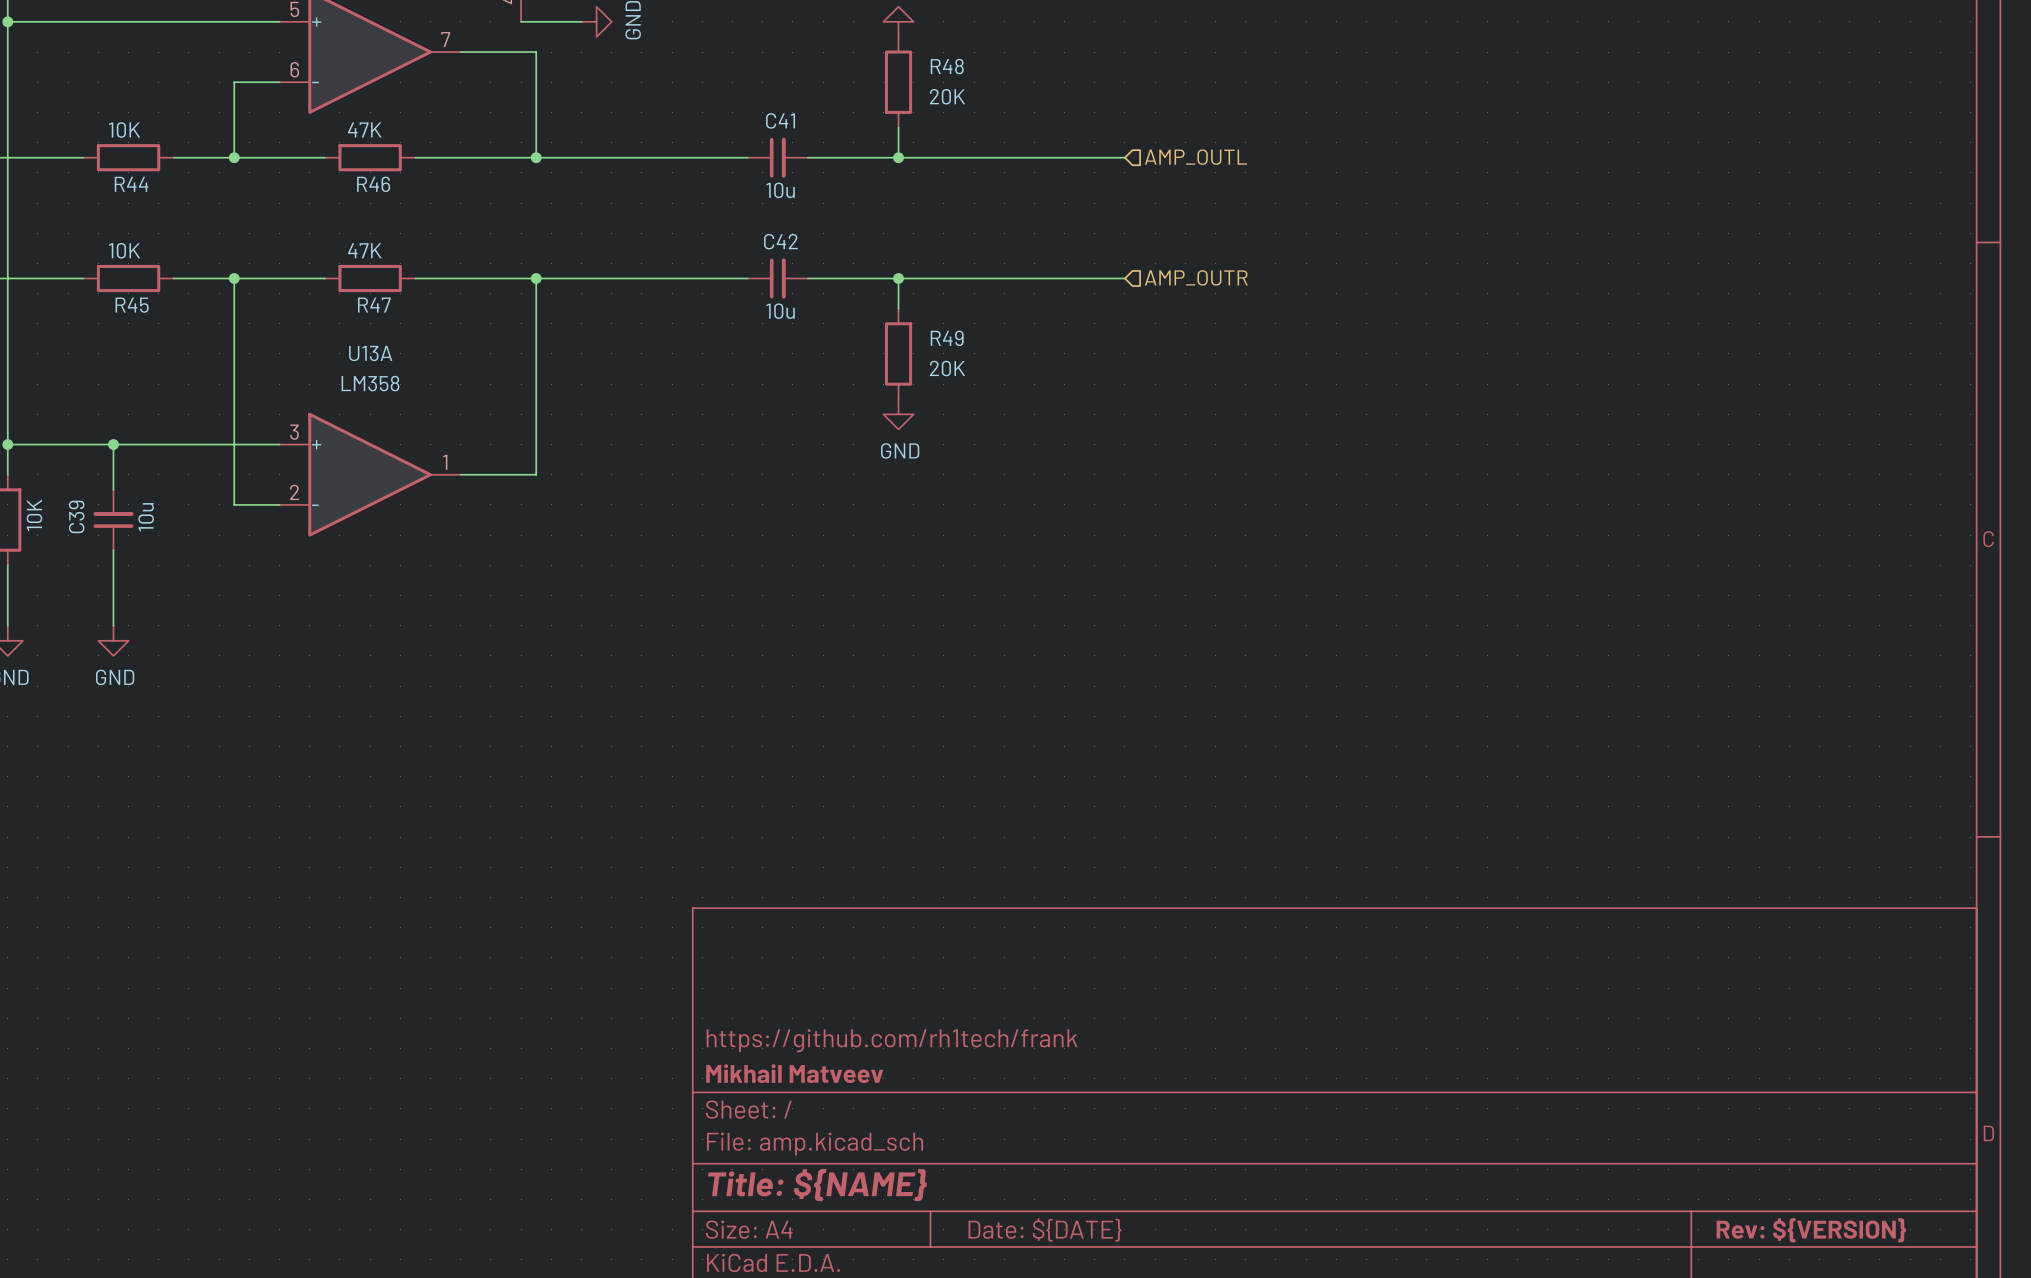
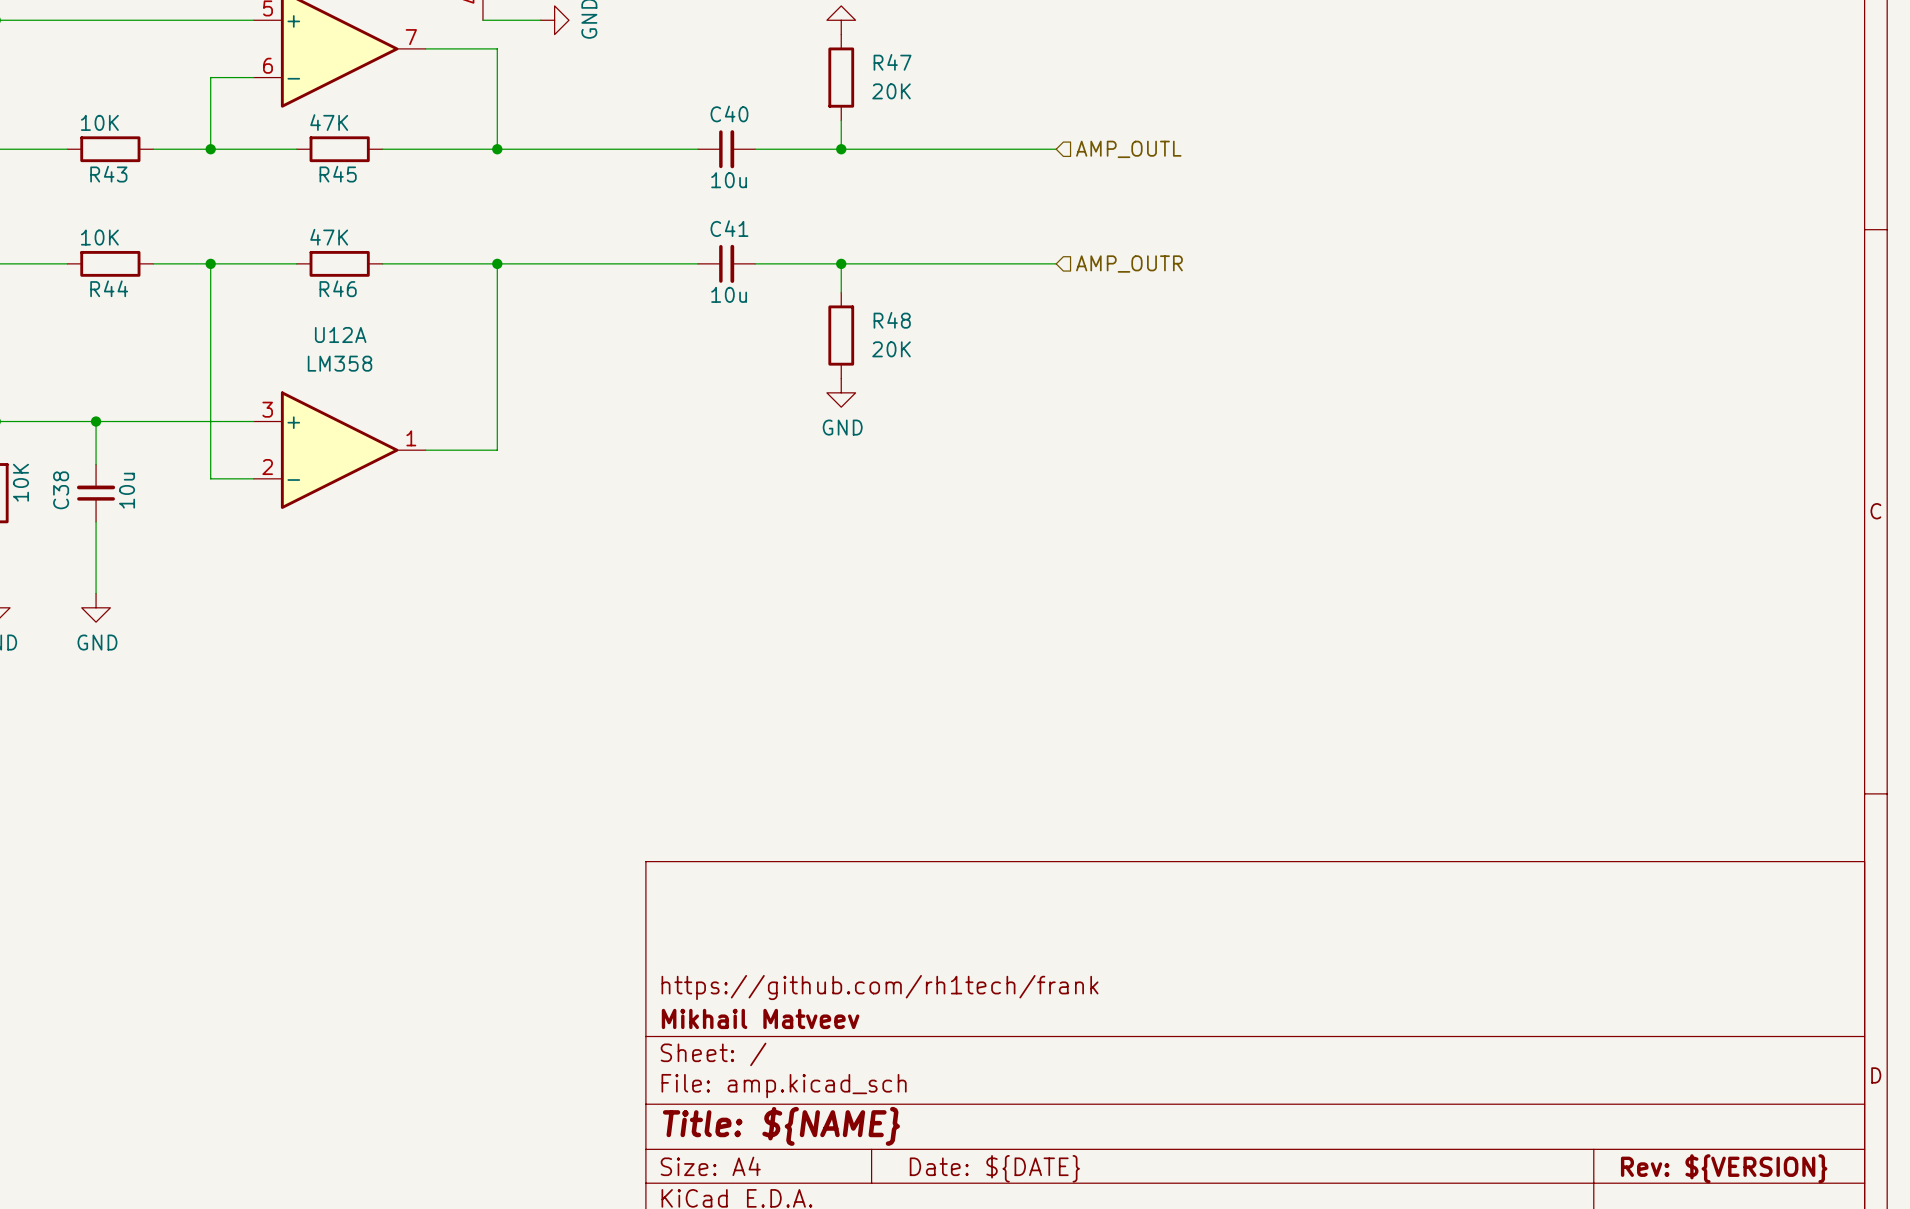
R48 name: R48 (947, 66) -> R47 (892, 62)
C41 name: C41 (780, 120) -> C40 (729, 113)
R44 name: R44 (131, 184) -> R43 (108, 174)
R46 name: R46 (373, 184) -> R45 (338, 174)
C42 name: C42 (780, 241) -> C41 (729, 228)
R45 name: R45 (132, 305) -> R44 (109, 288)
R47 name: R47 (374, 305) -> R46 (338, 288)
R49 name: R49 (947, 338) -> R48 (892, 320)
U13A name: U13A (370, 353) -> U12A (340, 335)
C39 name: C39 (76, 516) -> C38 (61, 490)

